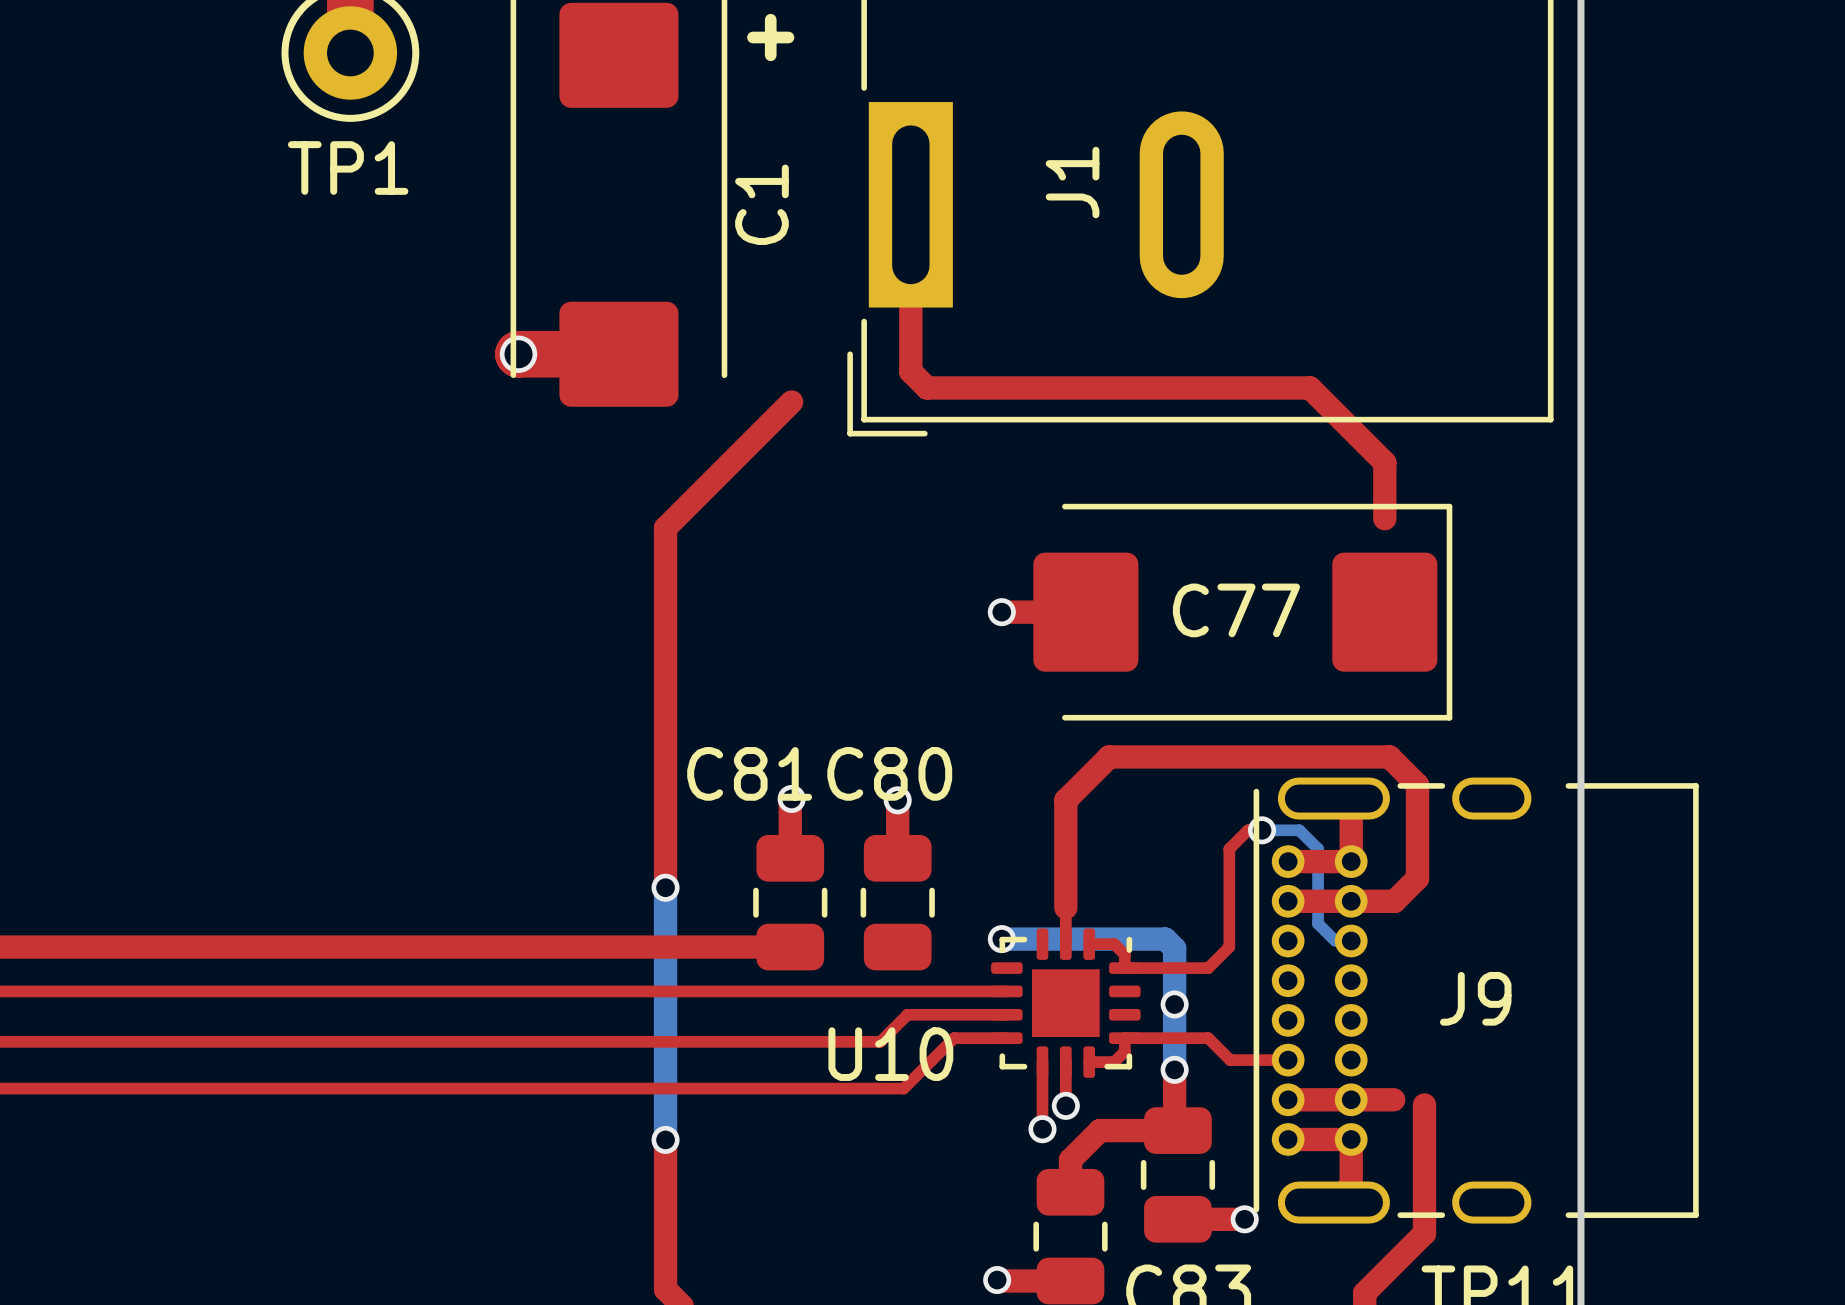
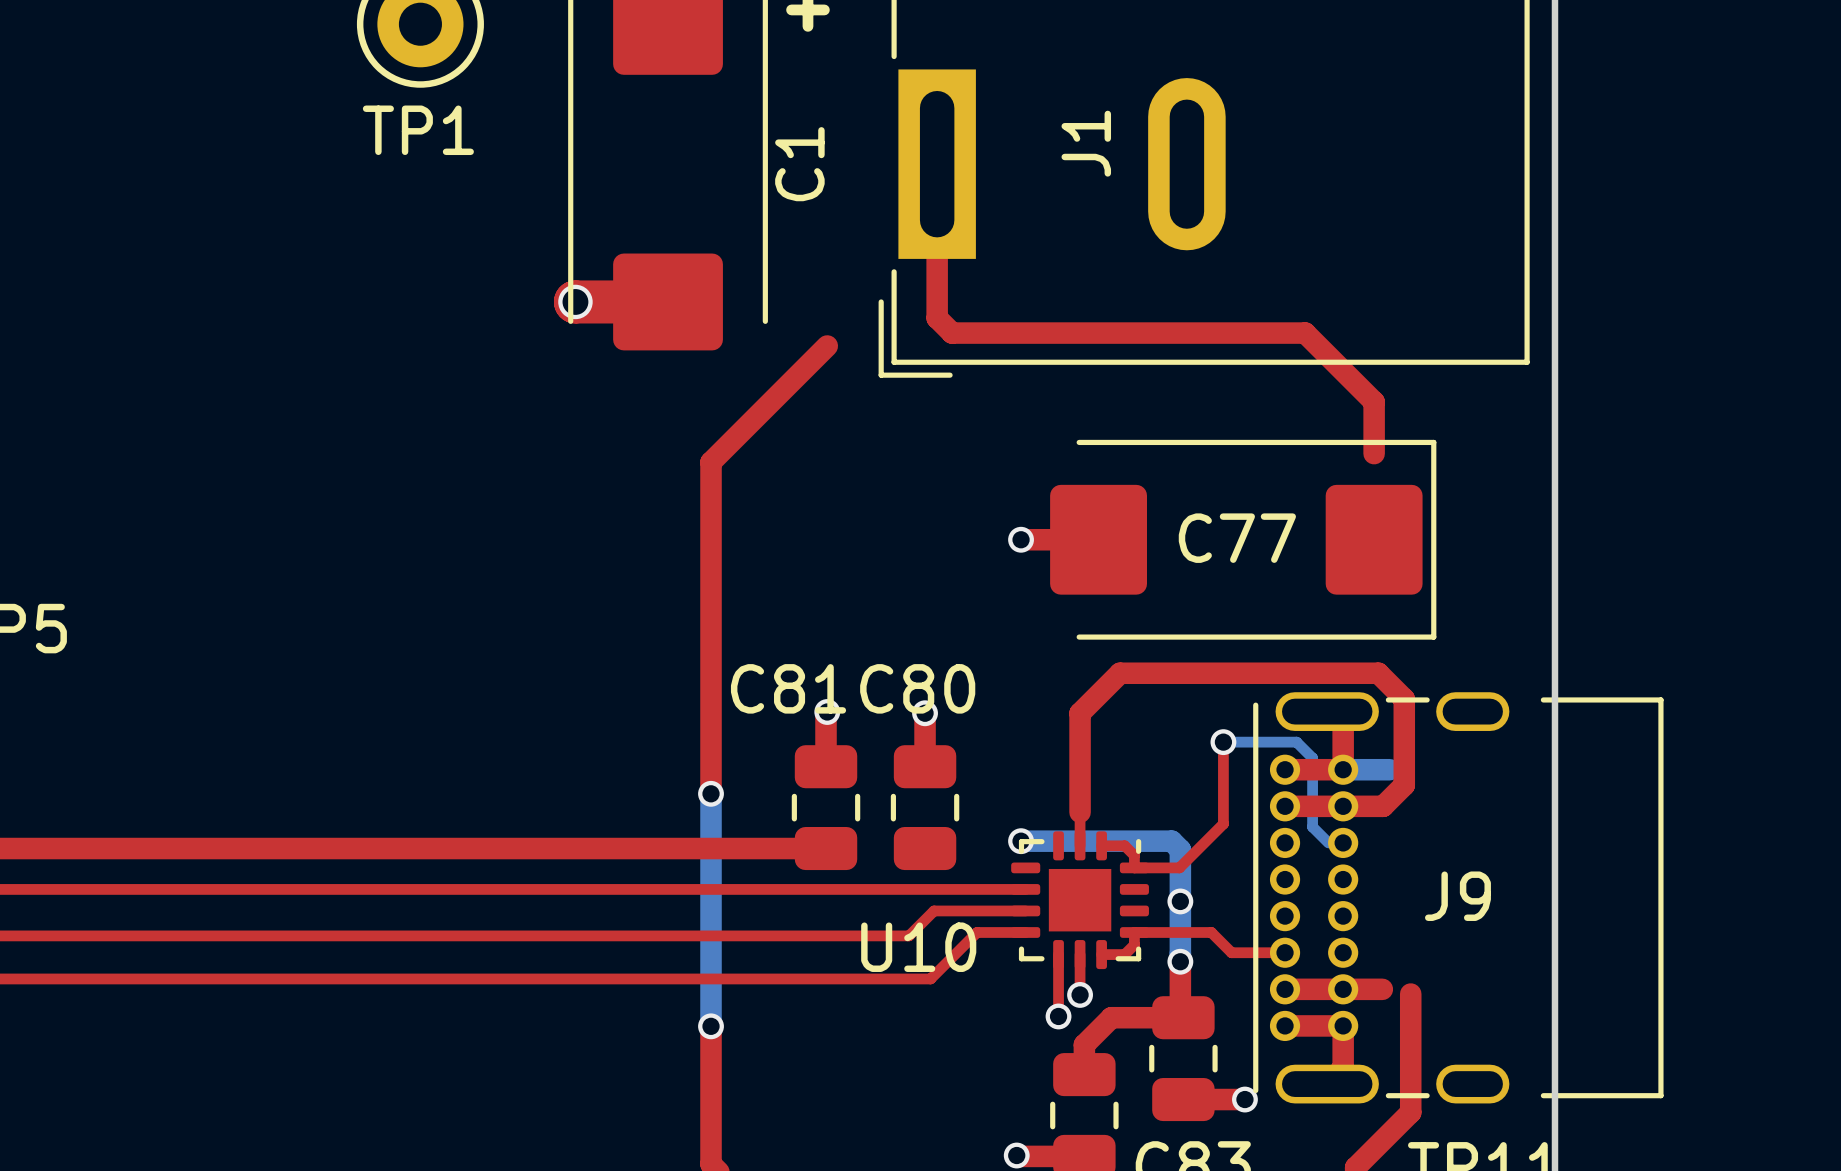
top track: (1262, 830) (1248, 830) (1229, 848) (1229, 947) (1208, 968) (1173, 968) -> (1223, 742) (1223, 823) (1179, 867)
via position: (1262, 830) -> (1223, 742)
bottom track: (1267, 830) (1300, 831) -> (1223, 742) (1296, 742)
bottom track: none -> (1343, 769) (1389, 769)

